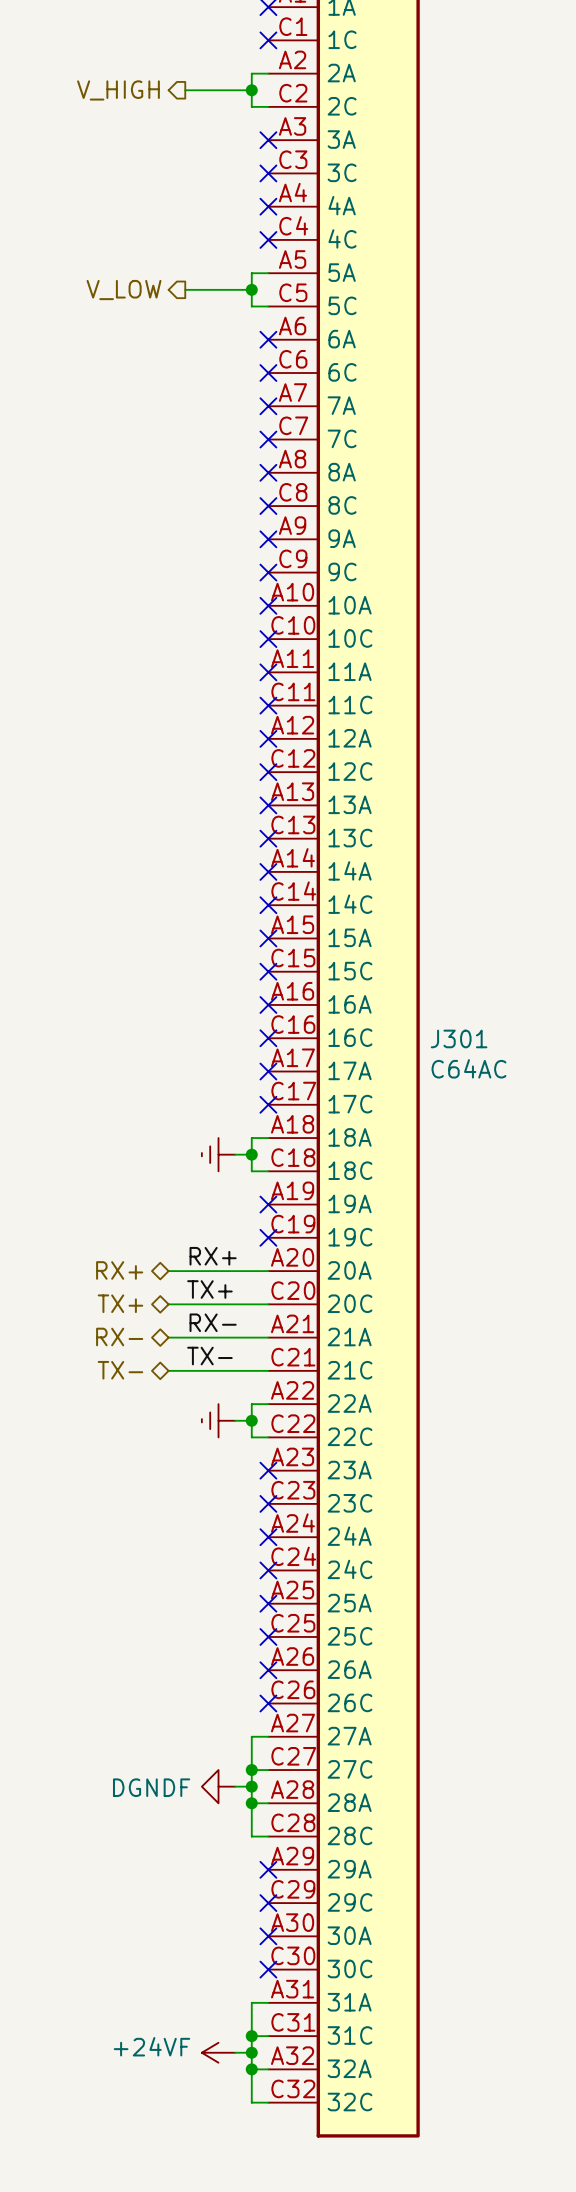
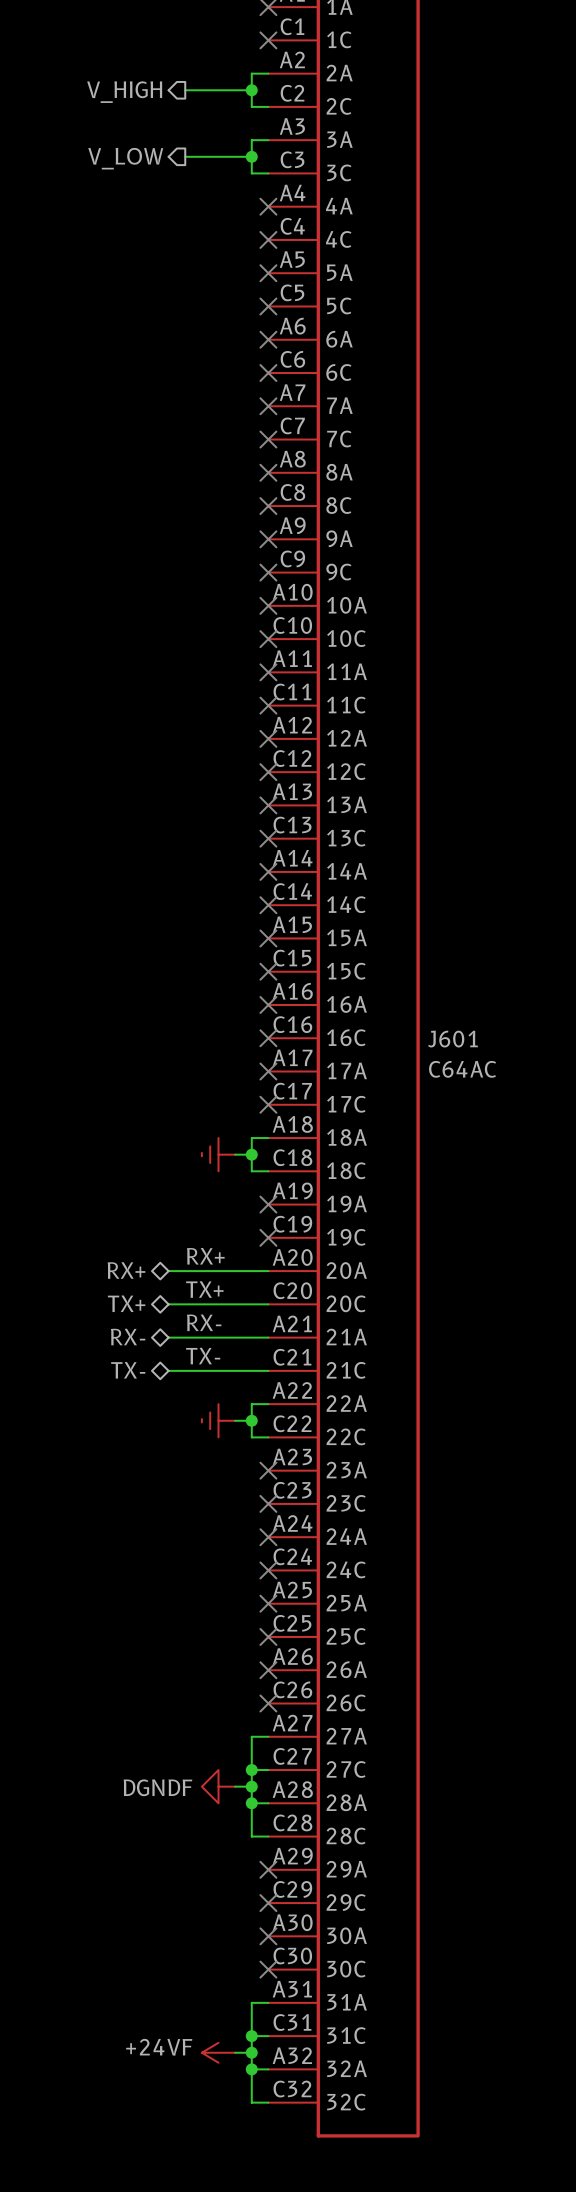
no-connect mark: (268, 140) -> none
junction: none -> (251, 156)
no-connect mark: (268, 173) -> none
wire: (268, 273) (251, 273) (251, 306) (268, 306) -> (268, 140) (251, 140) (251, 173) (268, 173)
no-connect mark: none -> (268, 273)
wire: (185, 289) (251, 289) -> (185, 156) (251, 156)
junction: (251, 289) -> none
hierarchical label position: V_LOW (124, 290) -> V_LOW (125, 158)
no-connect mark: none -> (268, 306)
J301 name: J301 (459, 1038) -> J601 (452, 1039)

